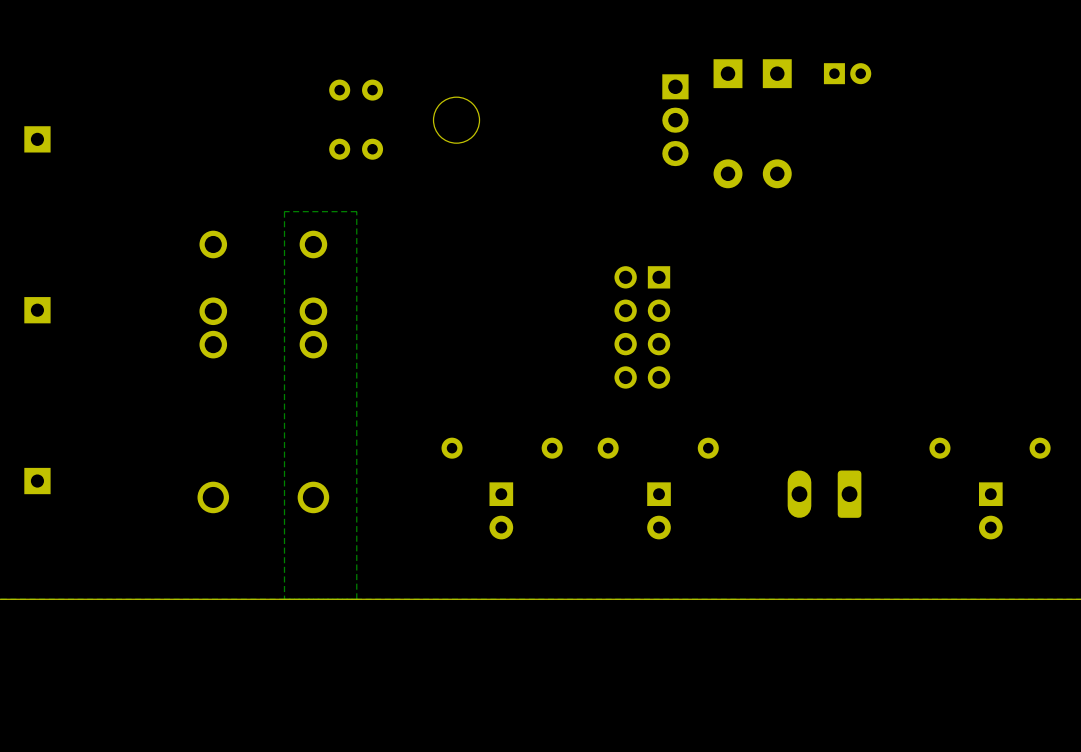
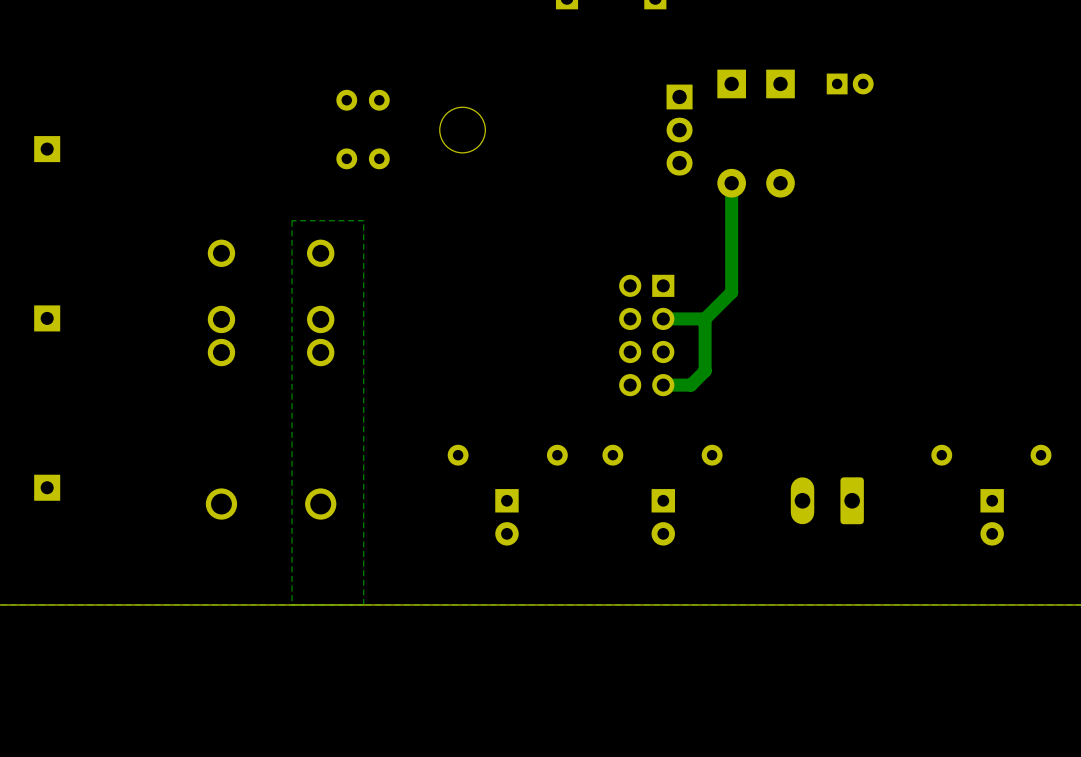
track: none -> (731, 183) (731, 292) (705, 318)
track: none -> (705, 318) (663, 318)
track: none -> (705, 318) (705, 371) (691, 385) (663, 385)

